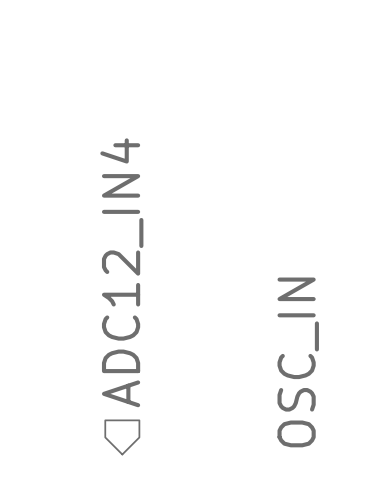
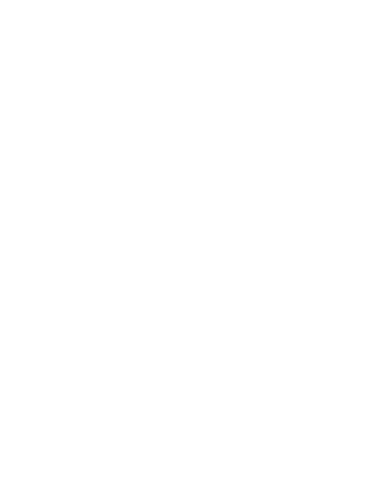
hierarchical label: ADC12_IN4 (121, 272) -> none
label: OSC_IN (298, 362) -> none

